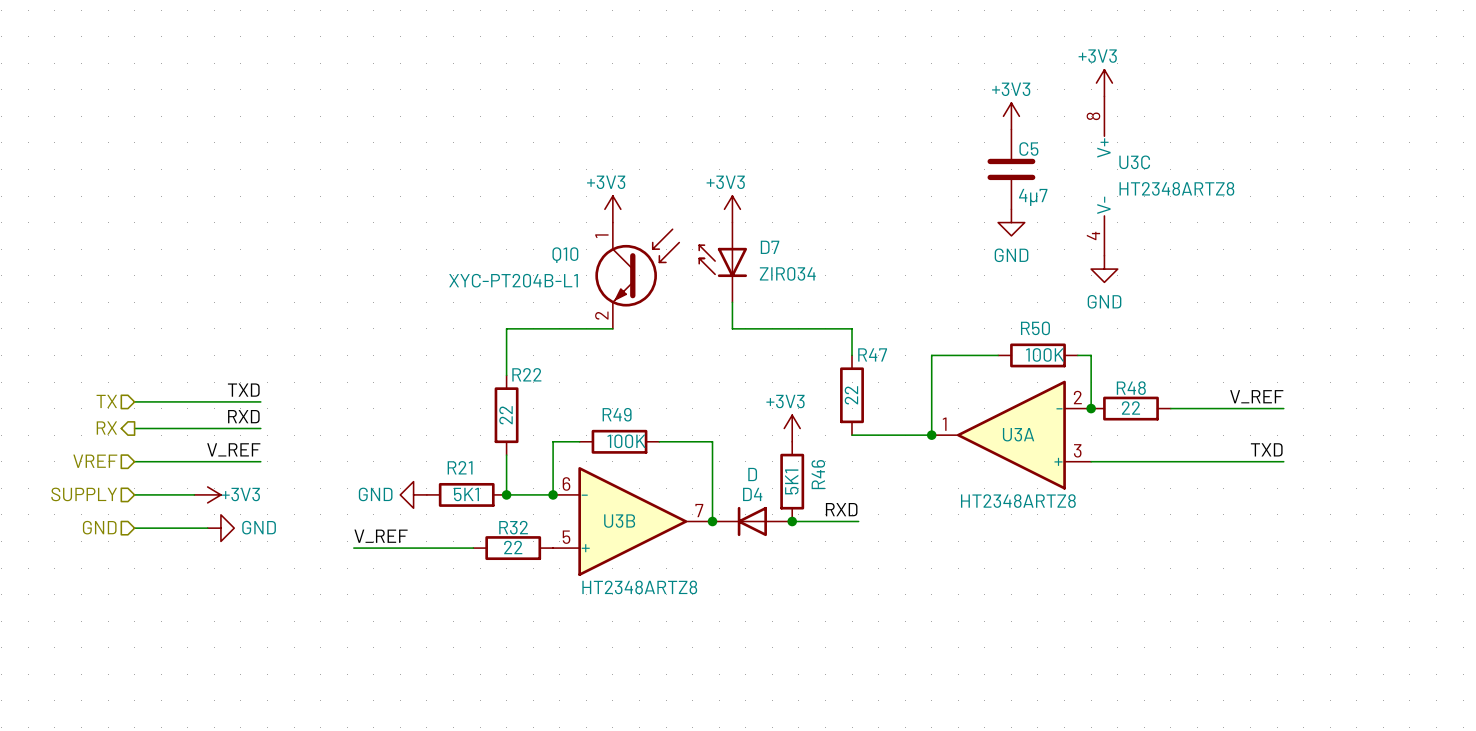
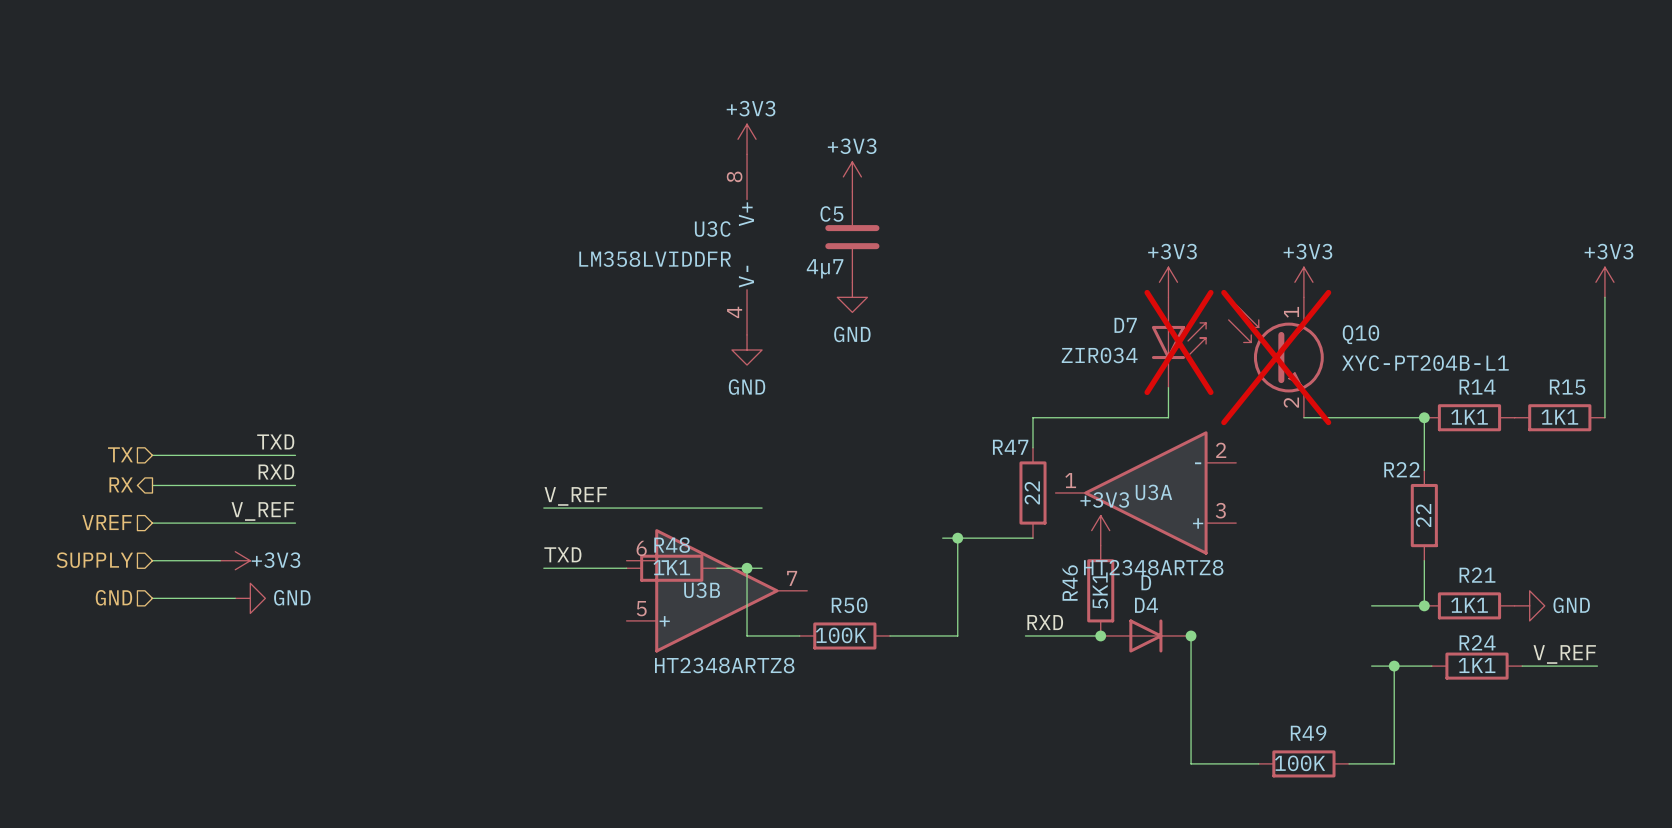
power symbol: +3V3 (1104, 83) -> none
power symbol: +3V3 (1011, 116) -> none
power symbol: none -> +3V3 (747, 139)
C5 name position: C5 (1028, 149) -> C5 (831, 213)
power symbol: none -> +3V3 (852, 176)
U3C name position: U3C (1134, 162) -> U3C (712, 229)
C5 position: (1011, 169) -> (852, 237)
U3C position: (1104, 176) -> (747, 244)
U3C value: HT2348ARTZ8 (1176, 188) -> LM358LVIDDFR (655, 259)
C5 value position: 4µ7 (1033, 197) -> 4µ7 (825, 268)
power symbol: +3V3 (612, 209) -> none
power symbol: +3V3 (732, 209) -> none
power symbol: GND (1011, 222) -> none
power symbol: none -> +3V3 (1168, 282)
power symbol: none -> +3V3 (1303, 282)
power symbol: none -> +3V3 (1604, 282)
D7 flip: as is (723, 261) -> left-right (1178, 340)
D7 position: (723, 262) -> (1178, 342)
power symbol: none -> GND (852, 297)
wire: none -> (1604, 297) (1604, 417)
Q10 flip: as is (637, 267) -> left-right (1276, 348)
power symbol: GND (1104, 269) -> none
Q10 position: (637, 275) -> (1276, 357)
wire: (732, 302) (732, 328) (852, 328) (852, 355) -> none
D7 do-not-place cross: none -> (1178, 342)
power symbol: none -> GND (747, 350)
Q10 do-not-place cross: none -> (1276, 357)
wire: (612, 328) (506, 328) (506, 375) -> none
R50 name position: R50 (1035, 328) -> R50 (849, 605)
wire: none -> (1168, 387) (1168, 417) (1032, 417) (1032, 447)
R47 name position: R47 (872, 354) -> R47 (1010, 447)
R50 value position: 100K (1045, 354) -> 100K (840, 635)
wire: (998, 355) (931, 355) (931, 435) (852, 435) -> none
R50 position: (1037, 355) -> (844, 635)
wire: (1077, 355) (1091, 355) (1091, 408) -> none
wire: none -> (1303, 417) (1424, 417) (1424, 470)
junction: none -> (1424, 417)
R14: none -> 1K1 (1469, 417)
R15: none -> 1K1 (1559, 417)
R22 name position: R22 (526, 374) -> R22 (1402, 469)
R47 position: (852, 395) -> (1032, 492)
label position: V_REF (1256, 396) -> V_REF (1564, 654)
junction: (1091, 408) -> none
R48 position: (1130, 408) -> (671, 568)
R48 value: 22 (1130, 408) -> 1K1 (671, 567)
wire: (1170, 408) (1283, 408) -> none
R49 name position: R49 (617, 414) -> R49 (1308, 733)
R22 position: (506, 415) -> (1424, 515)
power symbol: +3V3 (792, 428) -> none
junction: (931, 435) -> none
wire: (579, 441) (553, 441) (553, 494) (506, 494) (506, 455) -> none
R49 position: (619, 441) -> (1303, 763)
R49 value position: 100K (626, 441) -> 100K (1300, 763)
wire: (659, 441) (712, 441) (712, 521) -> none
wire: none -> (543, 508) (762, 508)
label: TXD (1266, 449) -> none
wire: (1091, 461) (1283, 461) -> none
R21 name position: R21 (460, 467) -> R21 (1477, 575)
power symbol: none -> +3V3 (1100, 530)
R46 name position: R46 (818, 474) -> R46 (1070, 583)
wire: none -> (942, 538) (1032, 538)
wire: none -> (957, 538) (957, 635) (890, 635)
junction: none -> (957, 538)
R46 position: (792, 481) -> (1100, 590)
label: none -> TXD (562, 554)
power symbol: GND (413, 494) -> none
R21 position: (466, 494) -> (1469, 605)
R21 value: 5K1 (466, 494) -> 1K1 (1469, 605)
junction: (506, 494) -> none
junction: (553, 494) -> none
wire: none -> (1424, 560) (1424, 605) (1371, 605)
wire: none -> (543, 568) (626, 568)
wire: none -> (716, 568) (762, 568)
wire: none -> (747, 568) (747, 635) (799, 635)
junction: none -> (747, 568)
label position: RXD (841, 509) -> RXD (1045, 622)
junction: (712, 521) -> none
D4 rotation: 0° (752, 521) -> 180° (1145, 635)
D4 position: (752, 521) -> (1145, 635)
wire: (792, 521) (858, 521) -> (1025, 635) (1100, 635)
junction: (792, 521) -> none
junction: none -> (1424, 605)
power symbol: none -> GND (1529, 605)
label position: V_REF (381, 536) -> V_REF (575, 496)
wire: (353, 548) (473, 548) -> none
R32: 22 (513, 548) -> none
junction: none -> (1100, 635)
wire: none -> (1191, 635) (1191, 763) (1258, 763)
junction: none -> (1191, 635)
wire: none -> (1371, 666) (1431, 666)
wire: none -> (1394, 666) (1394, 763) (1349, 763)
junction: none -> (1394, 666)
R24: none -> 1K1 (1477, 666)
wire: none -> (1522, 666) (1597, 666)

